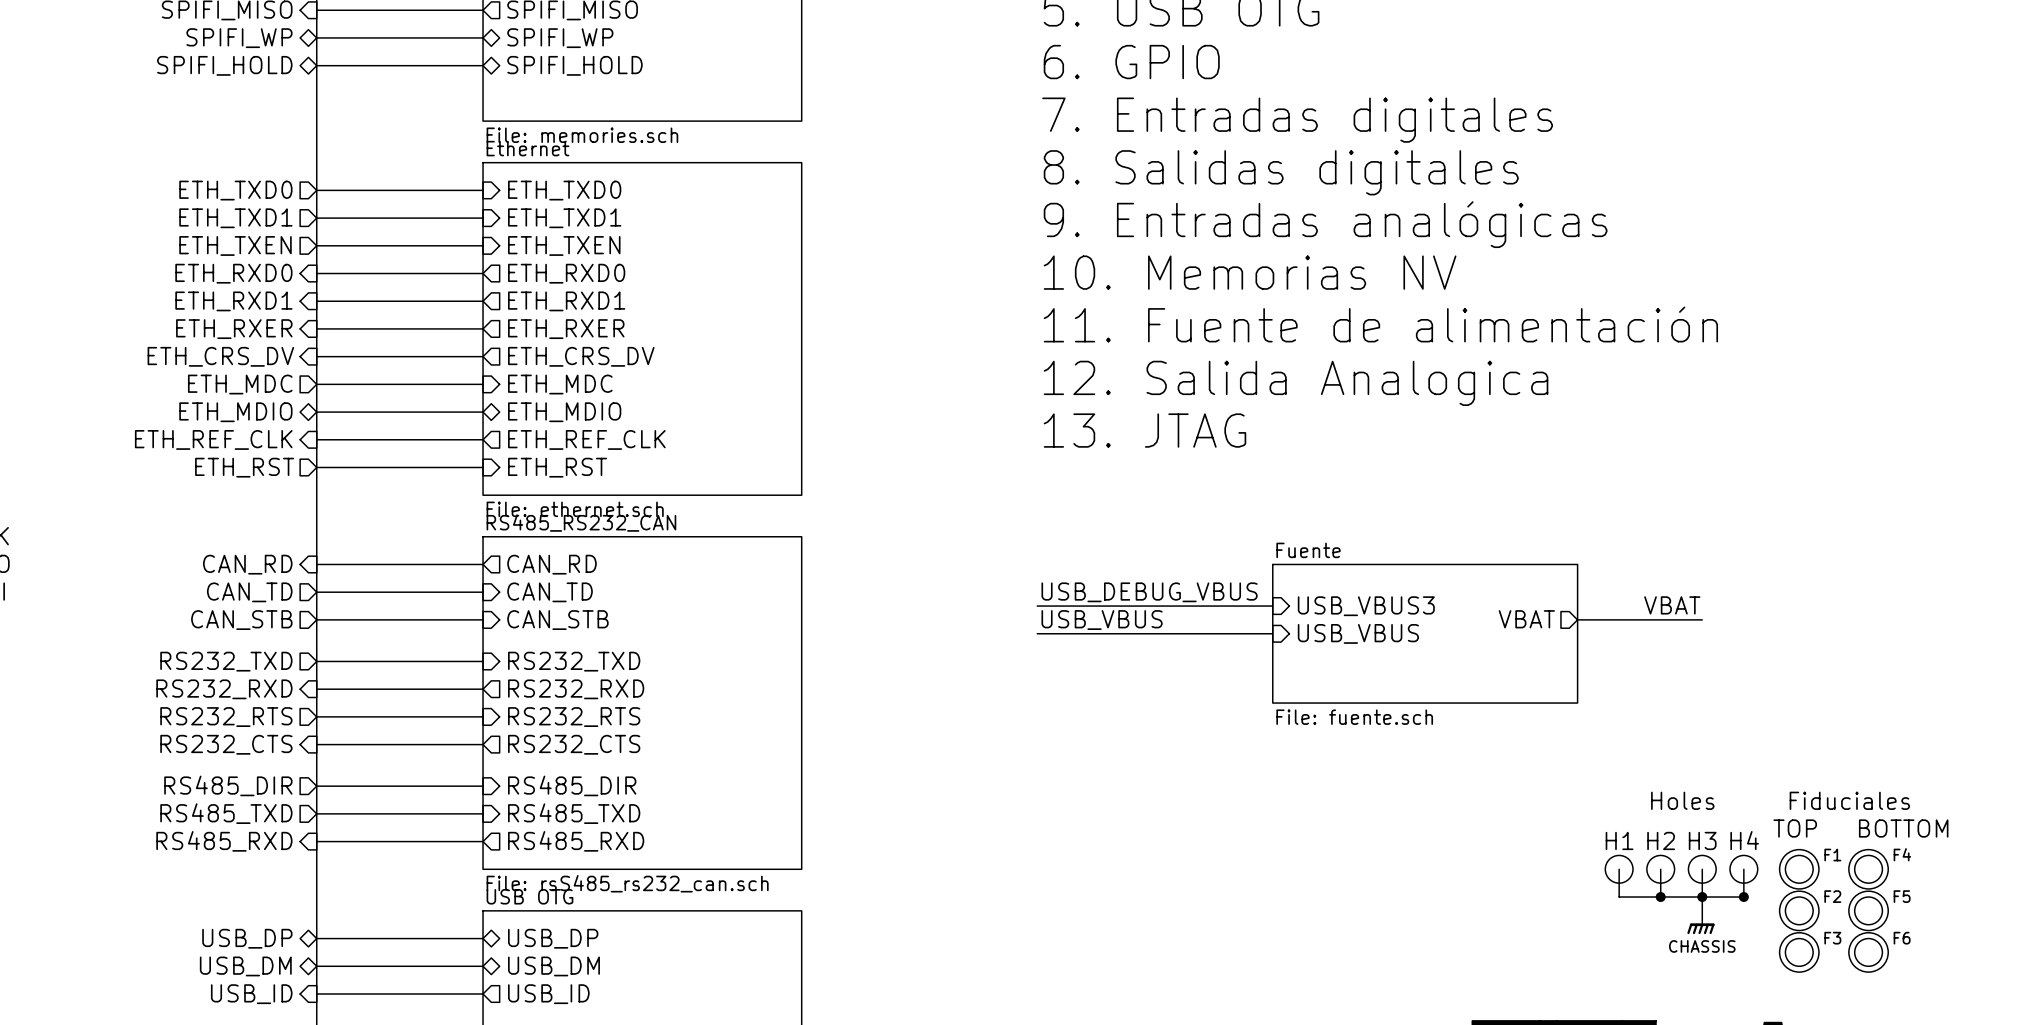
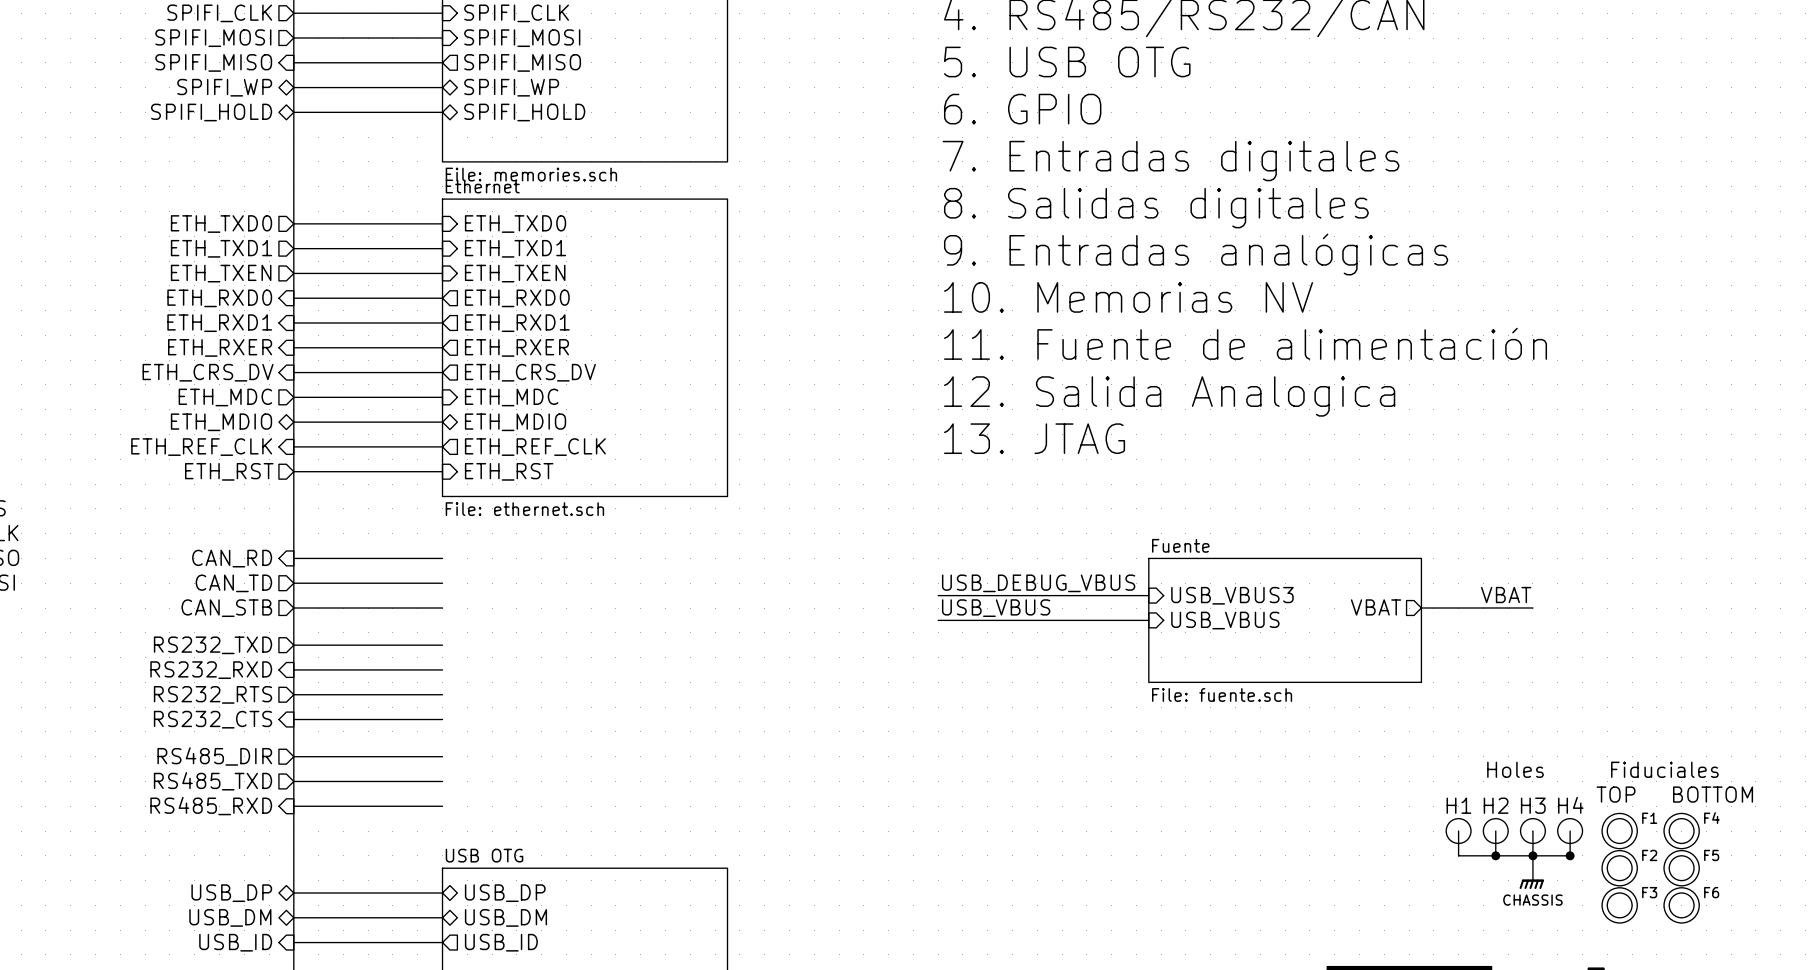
sheet pin: CAN_RD (552, 564) -> none
sheet pin: CAN_TD (550, 592) -> none
sheet pin: CAN_STB (557, 620) -> none
sheet pin: RS232_TXD (574, 661) -> none
sheet pin: RS232_RXD (576, 689) -> none
sheet RS485_RS232_CAN: File: rsS485_rs232_can.sch (642, 703) -> none
sheet pin: RS232_RTS (574, 717) -> none
sheet pin: RS232_CTS (574, 744) -> none
sheet pin: RS485_DIR (572, 785) -> none
sheet pin: RS485_TXD (574, 813) -> none
sheet pin: RS485_RXD (576, 841) -> none

